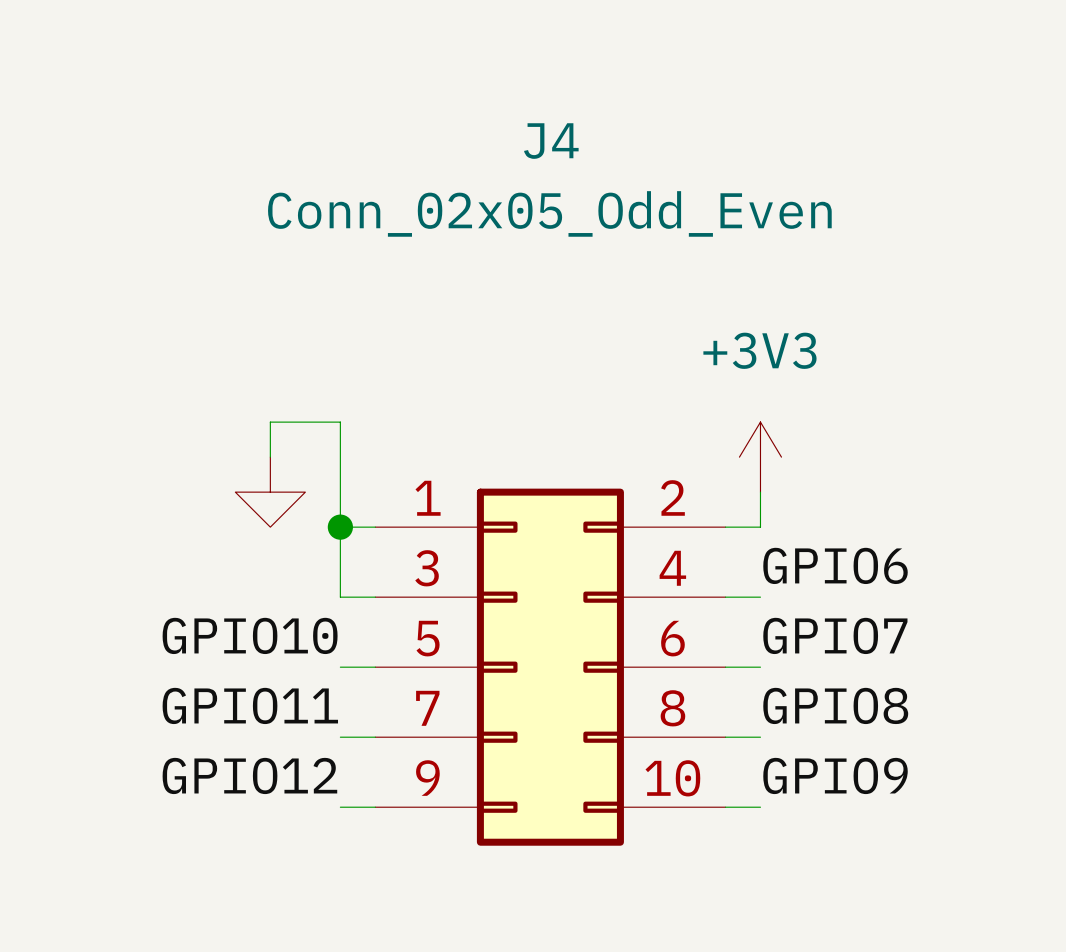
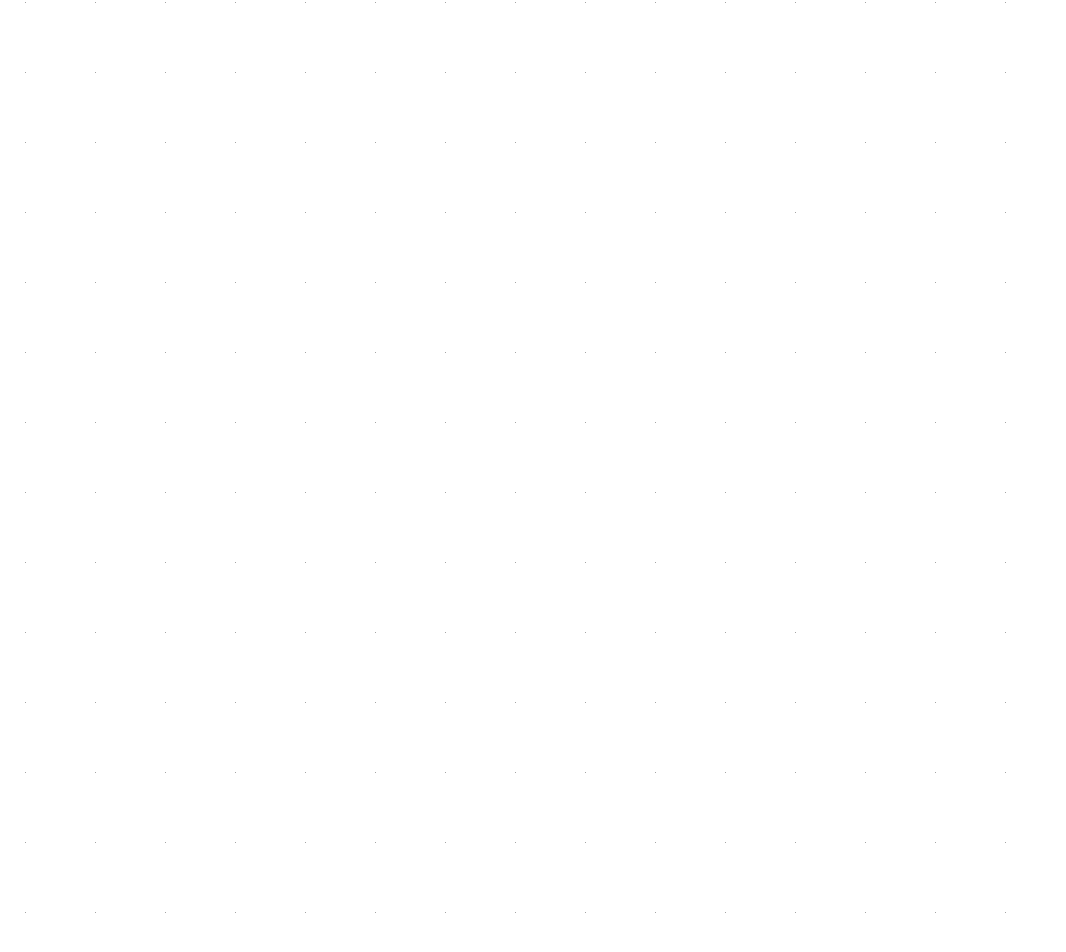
wire: (270, 457) (270, 422) (340, 422) (340, 597) (375, 597) -> none
power symbol: +3V3 (760, 457) -> none
power symbol: (270, 492) -> none
wire: (760, 492) (760, 527) (725, 527) -> none
wire: (340, 527) (375, 527) -> none
junction: (340, 527) -> none
label: GPIO6 (835, 565) -> none
wire: (725, 597) (760, 597) -> none
label: GPIO10 (250, 635) -> none
label: GPIO7 (835, 635) -> none
wire: (340, 667) (375, 667) -> none
J4: Conn_02x05_Odd_Even (550, 667) -> none
wire: (725, 667) (760, 667) -> none
label: GPIO11 (250, 705) -> none
label: GPIO8 (835, 705) -> none
wire: (340, 737) (375, 737) -> none
wire: (725, 737) (760, 737) -> none
label: GPIO12 (249, 775) -> none
label: GPIO9 (835, 775) -> none
wire: (340, 807) (375, 807) -> none
wire: (725, 807) (760, 807) -> none

